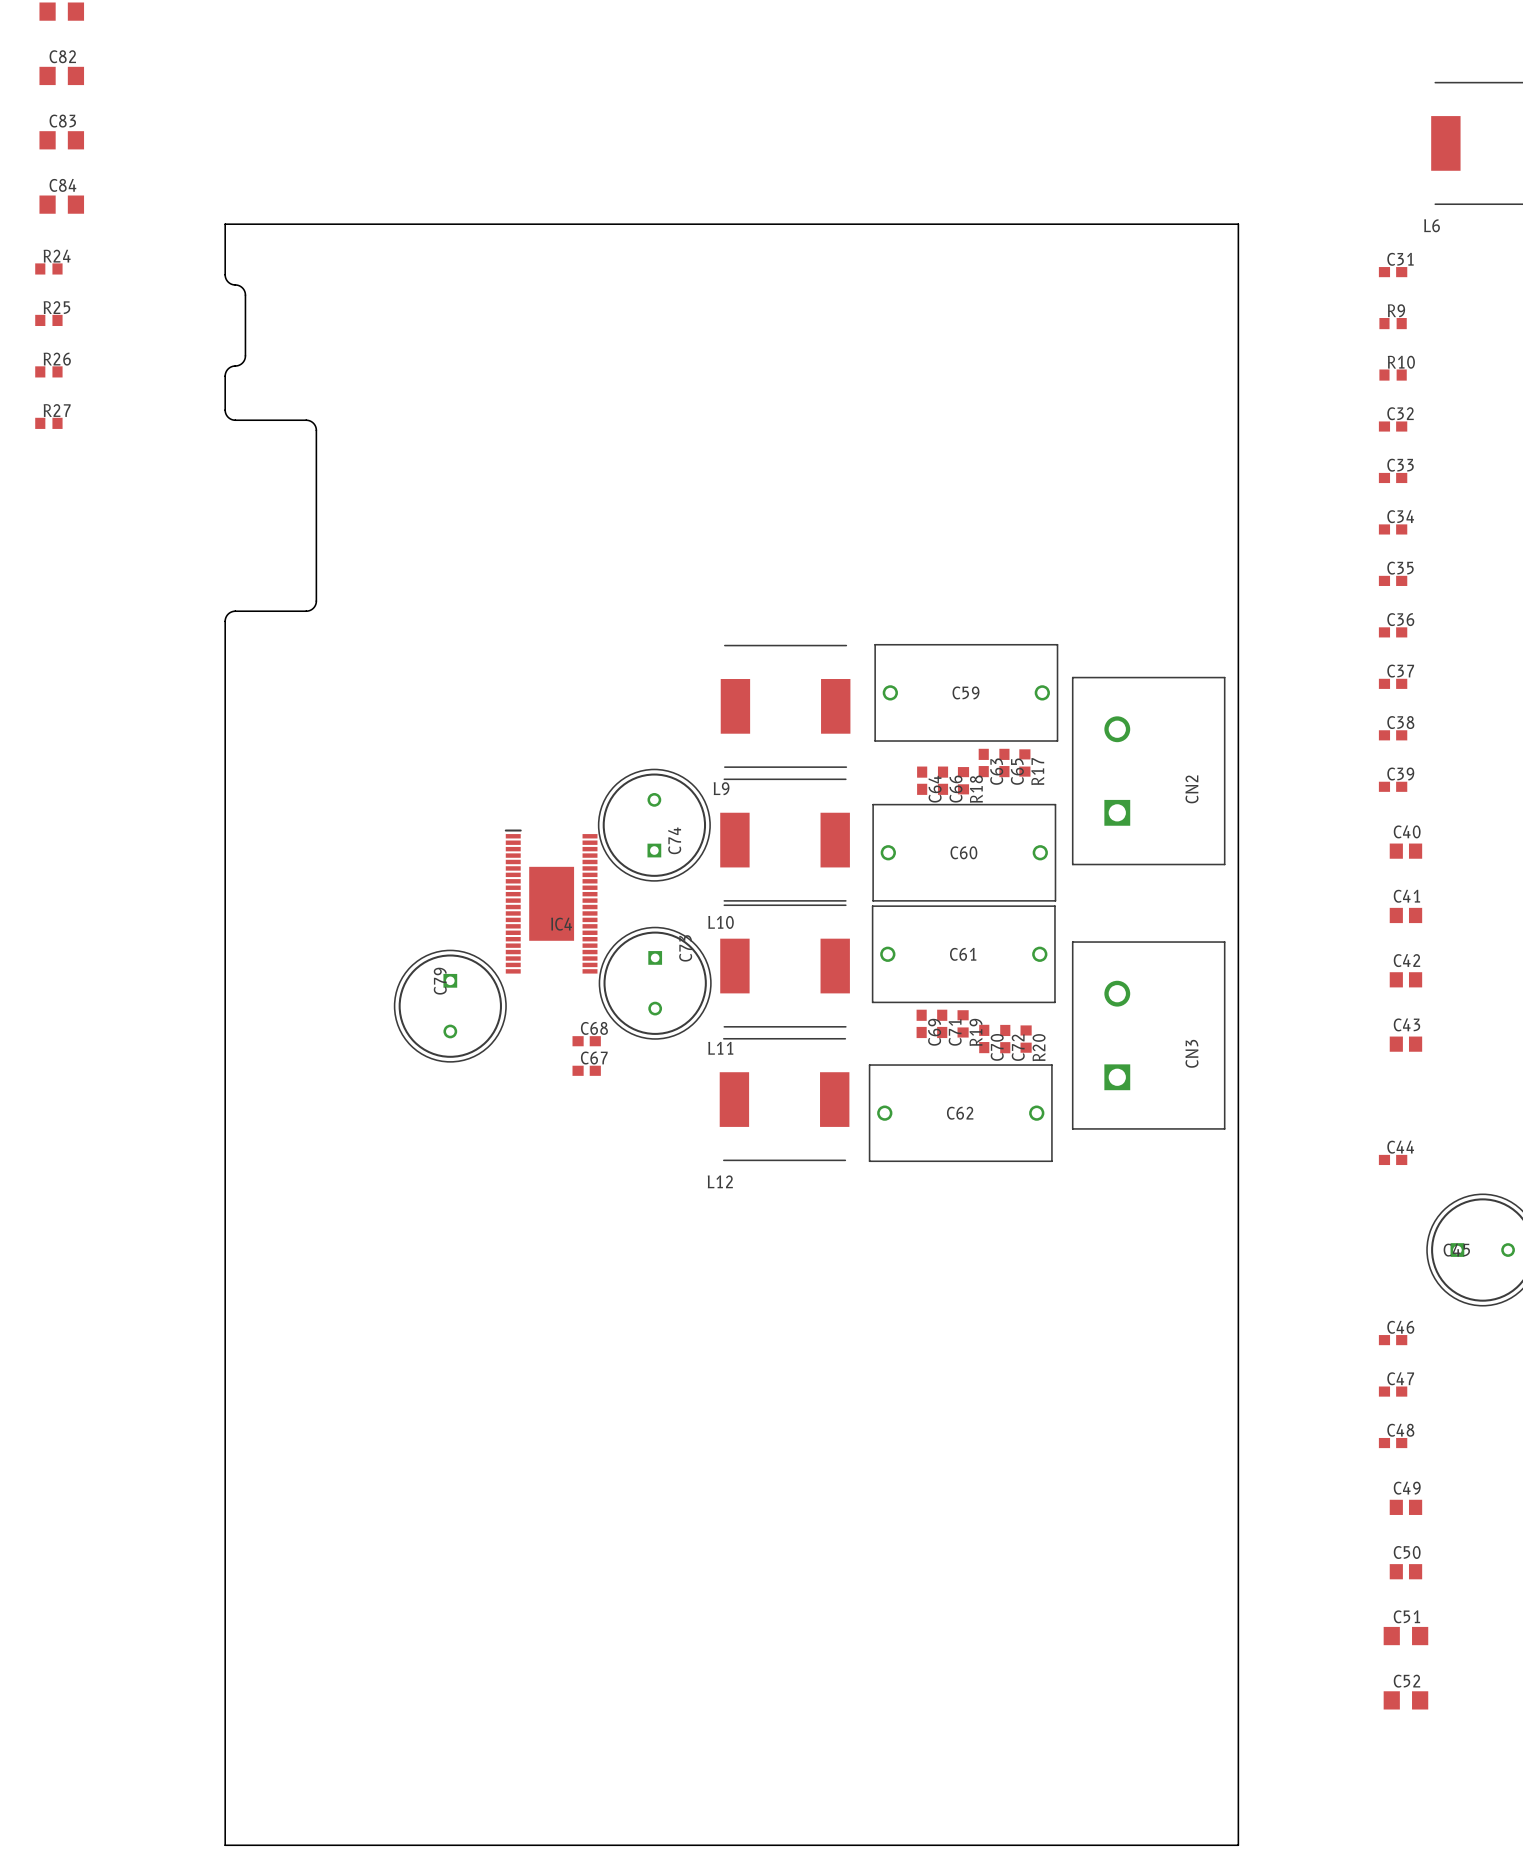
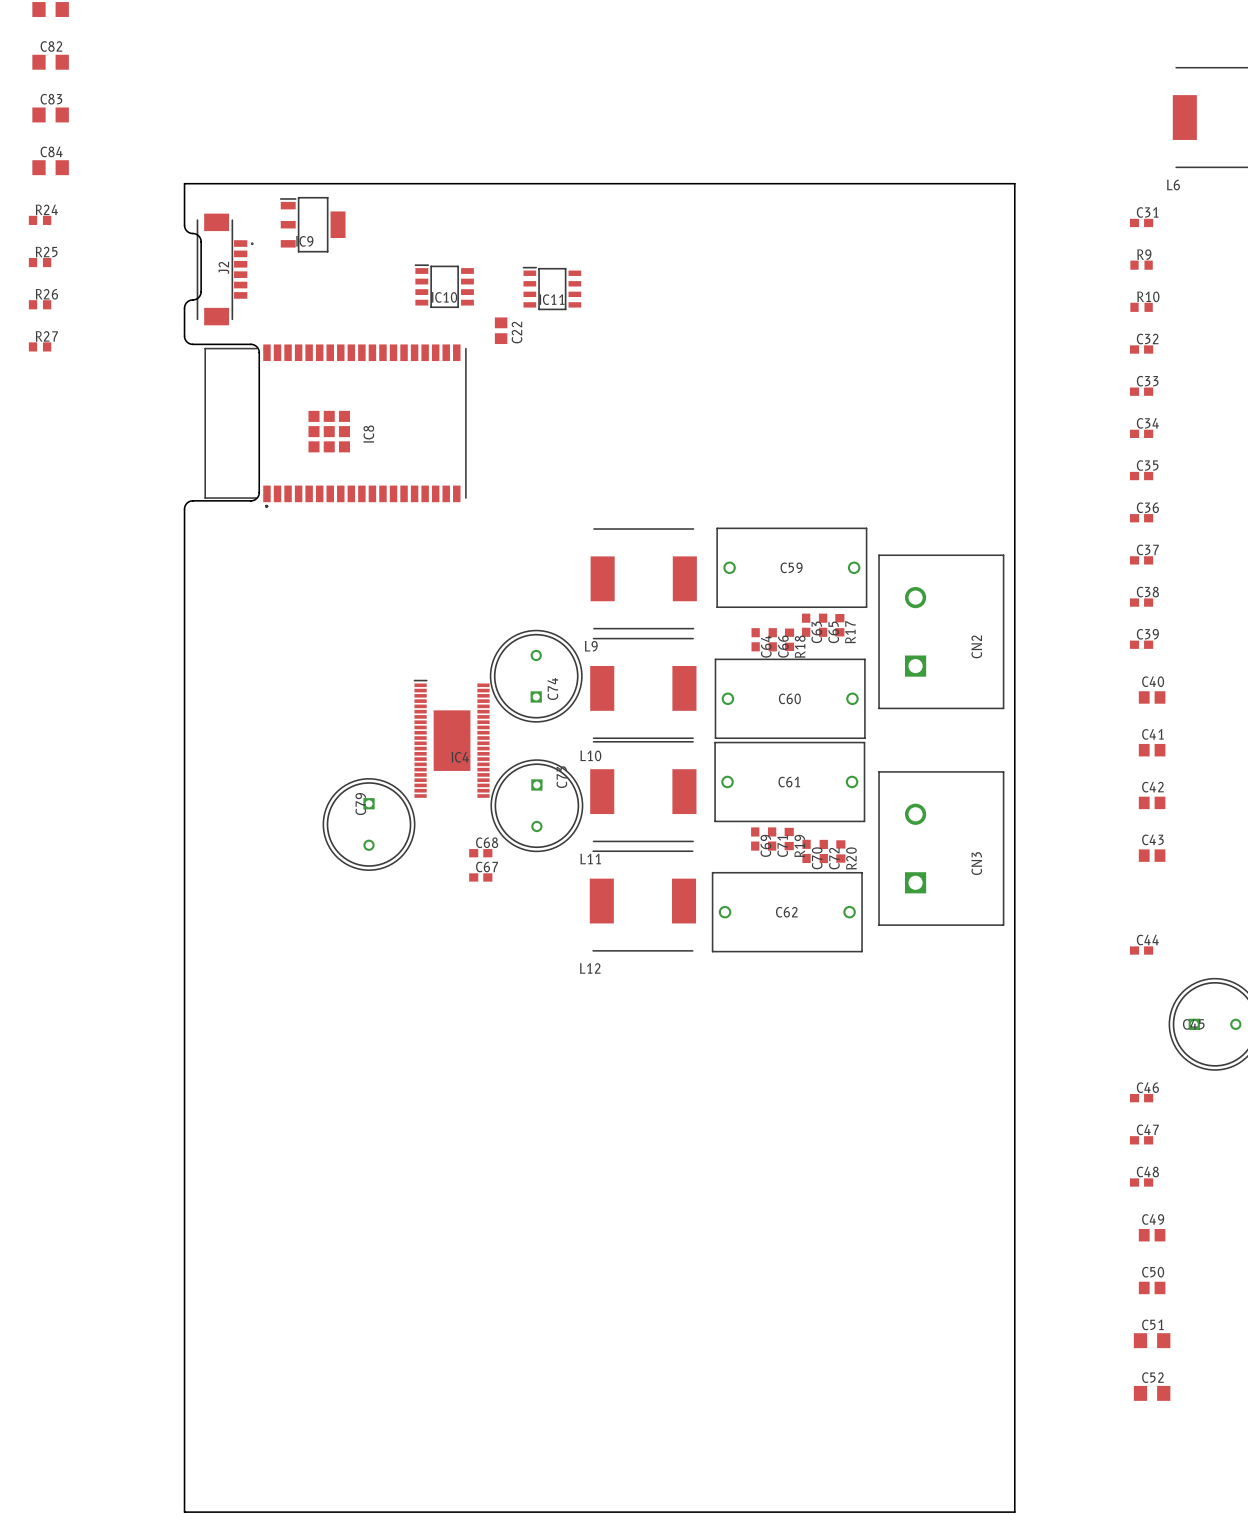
IC9: none -> (312, 224)
J2: none -> (225, 269)
IC10: none -> (444, 286)
IC11: none -> (551, 288)
C22: none -> (501, 330)
IC8: none -> (335, 426)

